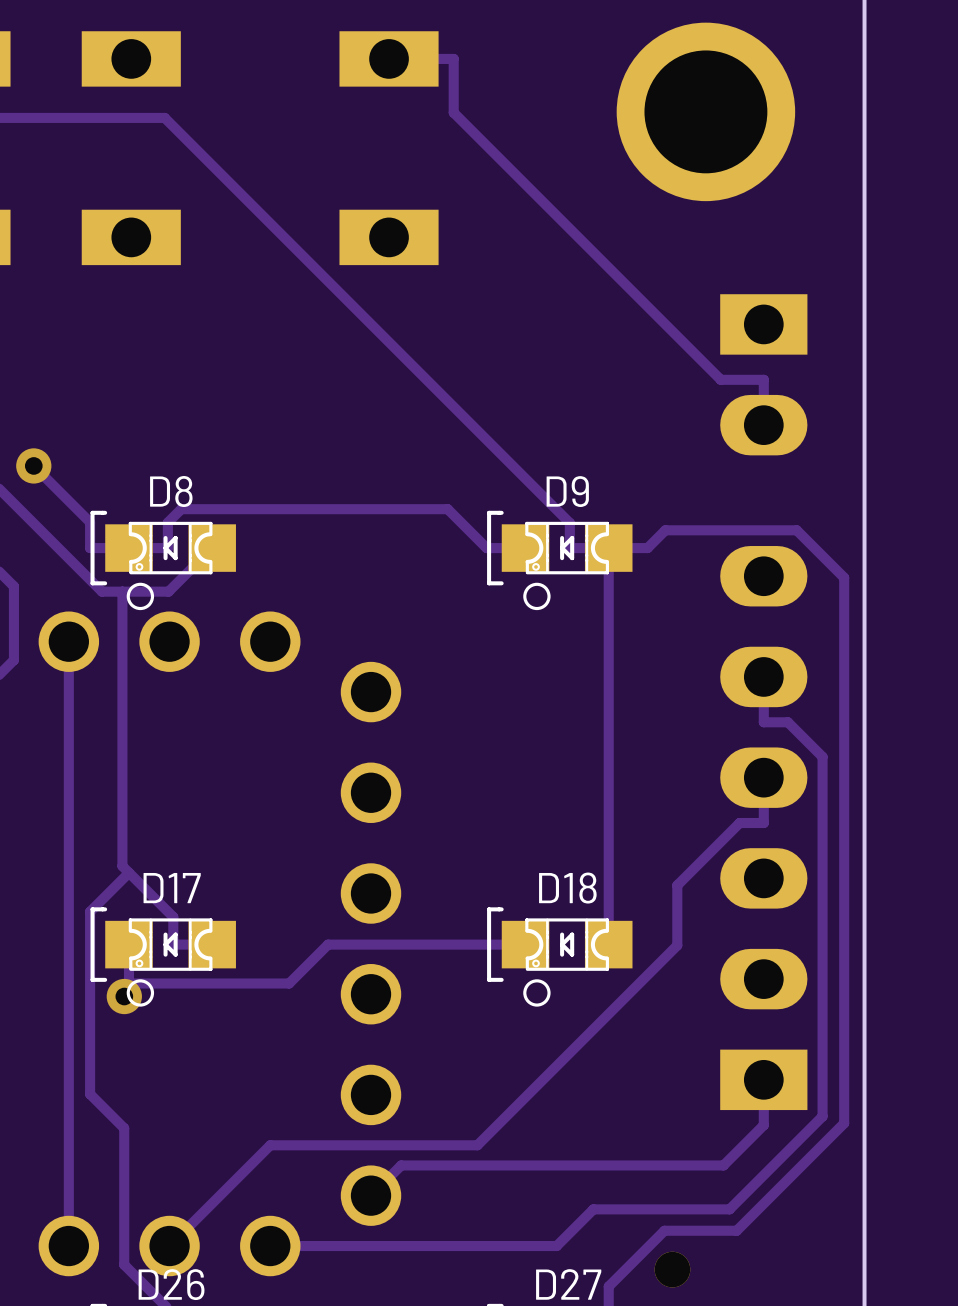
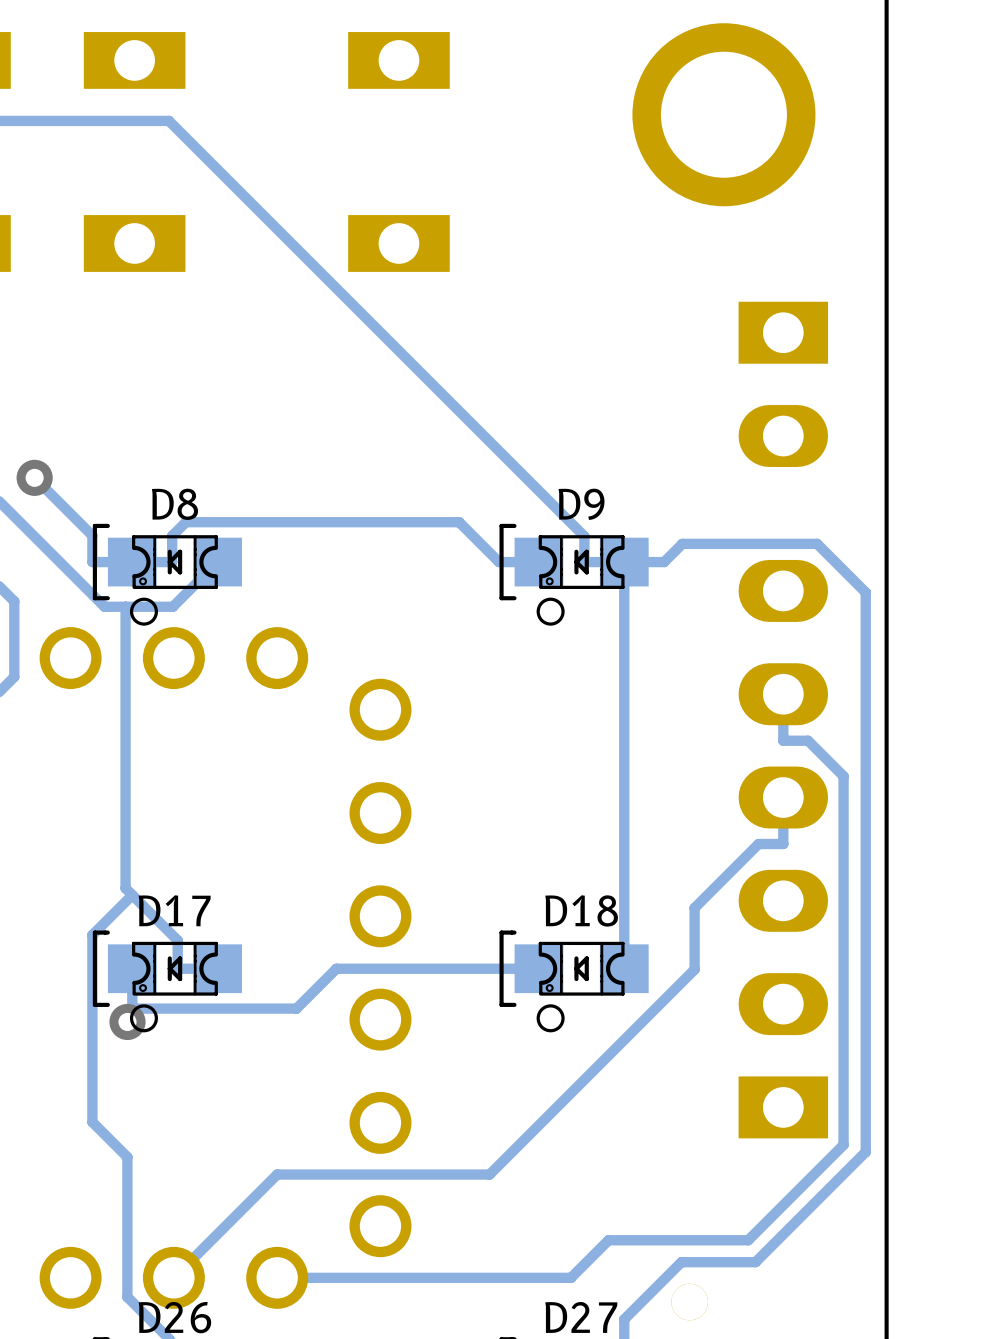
track: (389, 58) (453, 58) (453, 112) (720, 379) (763, 379) (763, 425) -> none
track: (68, 641) (68, 1246) -> none
track: (763, 1079) (763, 1125) (723, 1165) (401, 1165) (371, 1195) -> none

